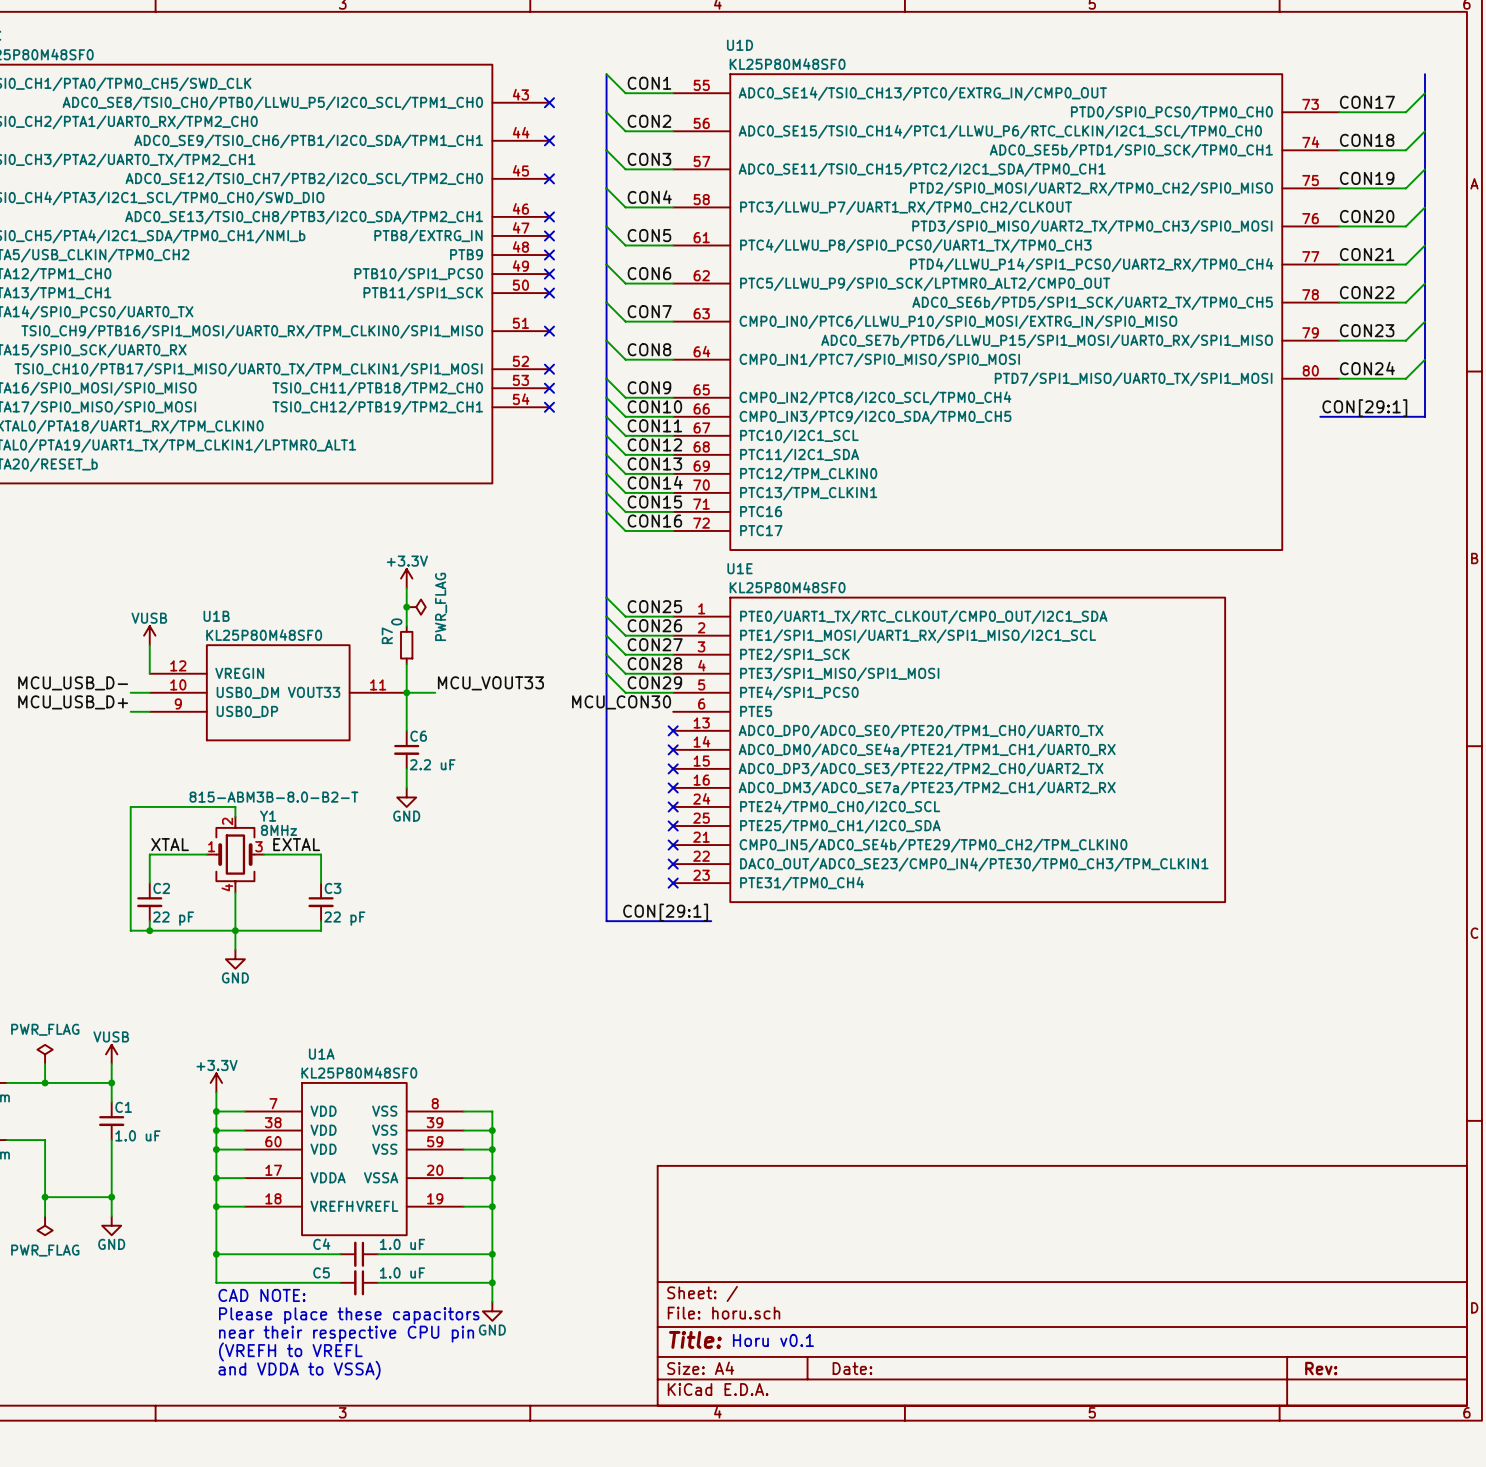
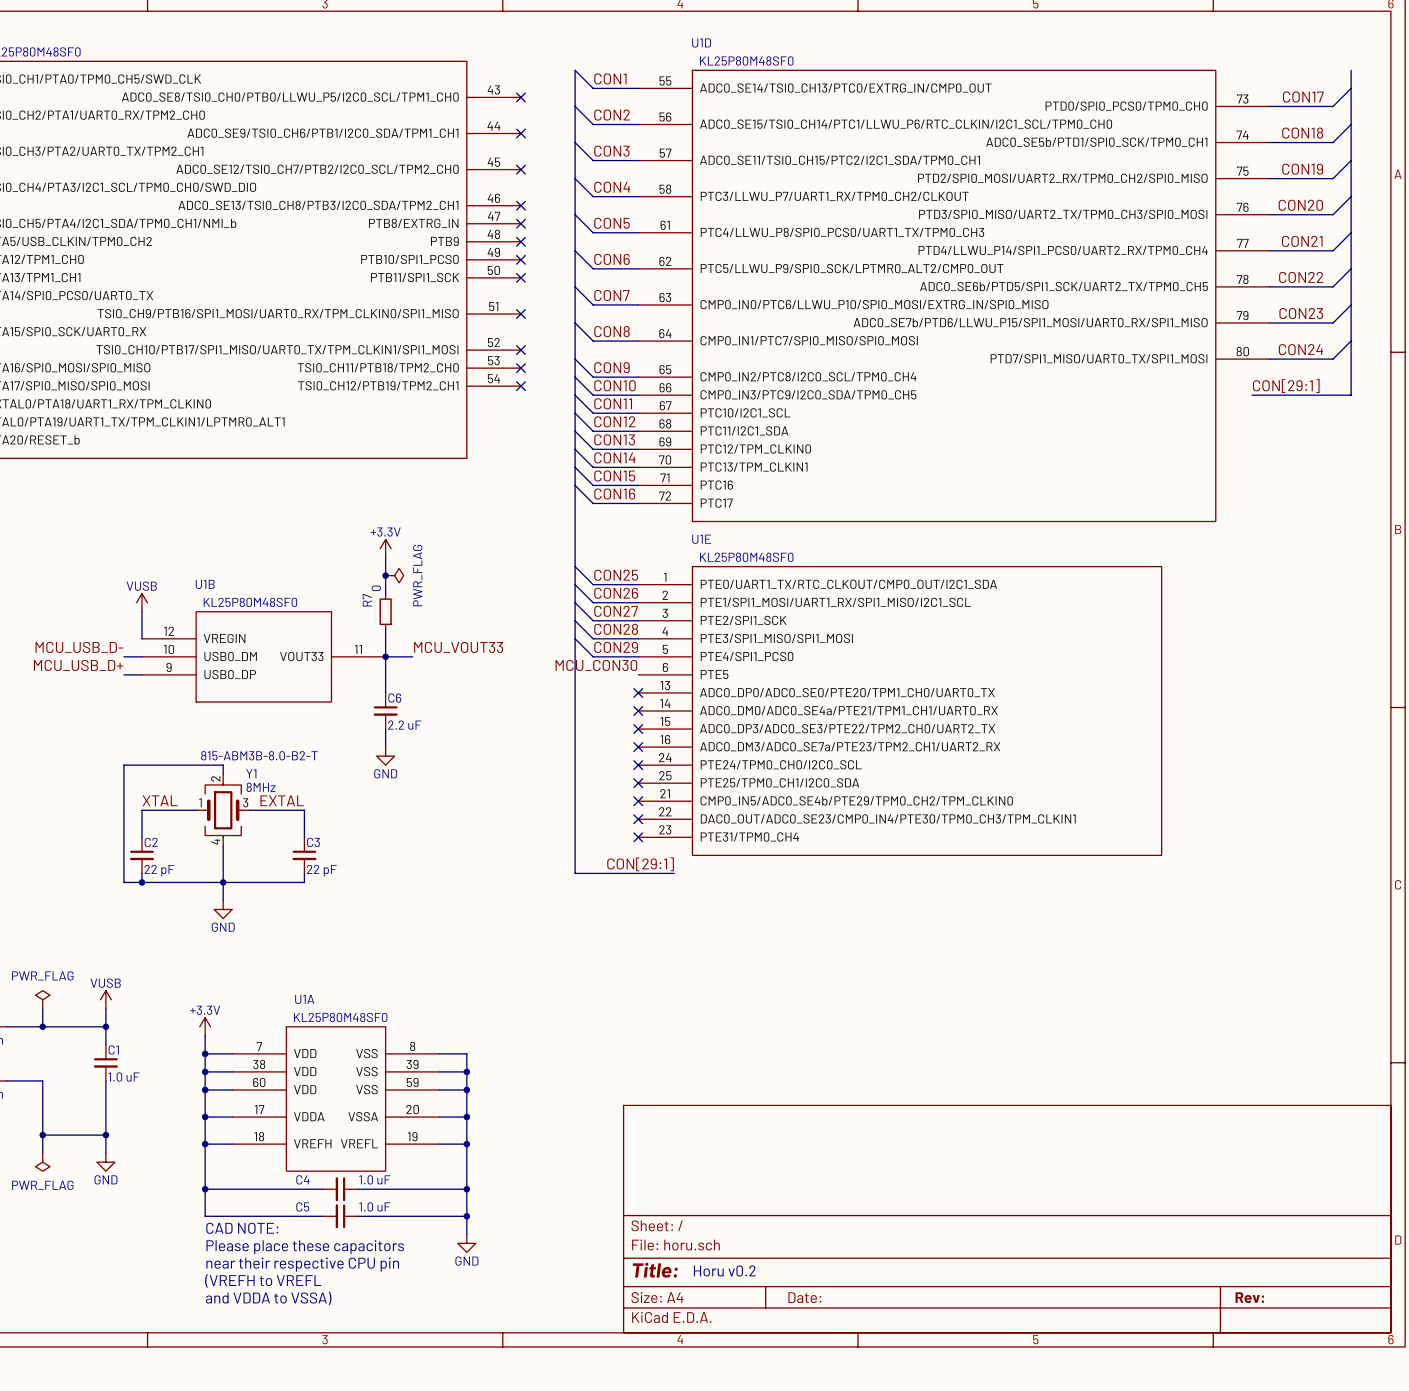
text: Horu v0.1 (773, 1340) -> Horu v0.2 (724, 1270)

